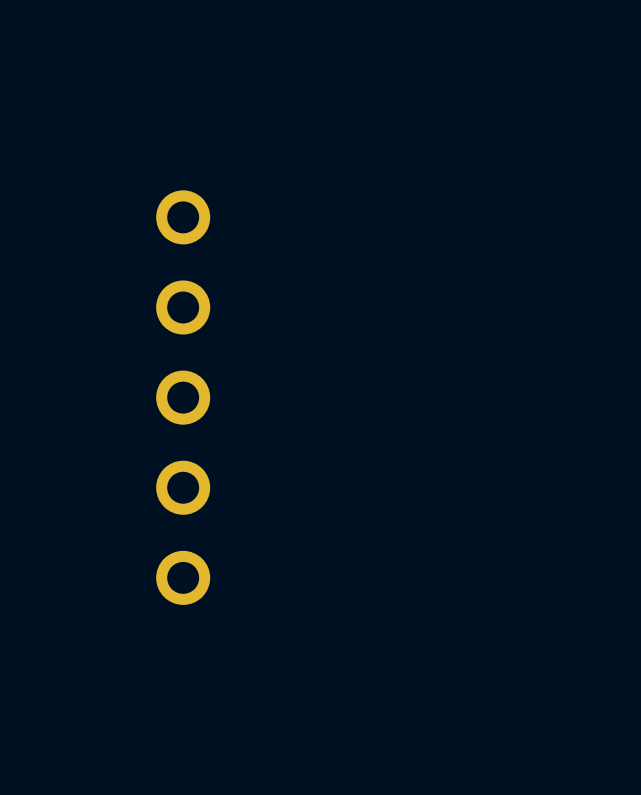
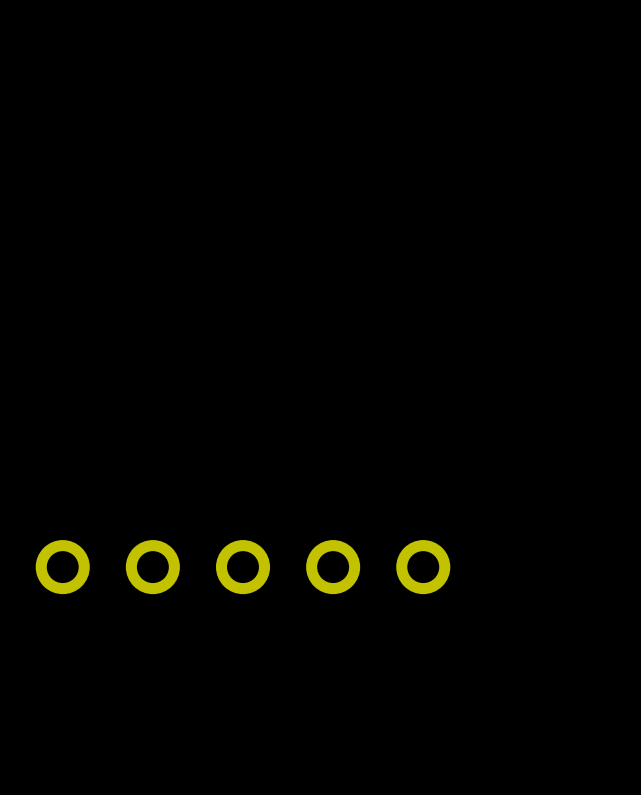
part rotation: 0° (183, 397) -> 90° clockwise (243, 567)

